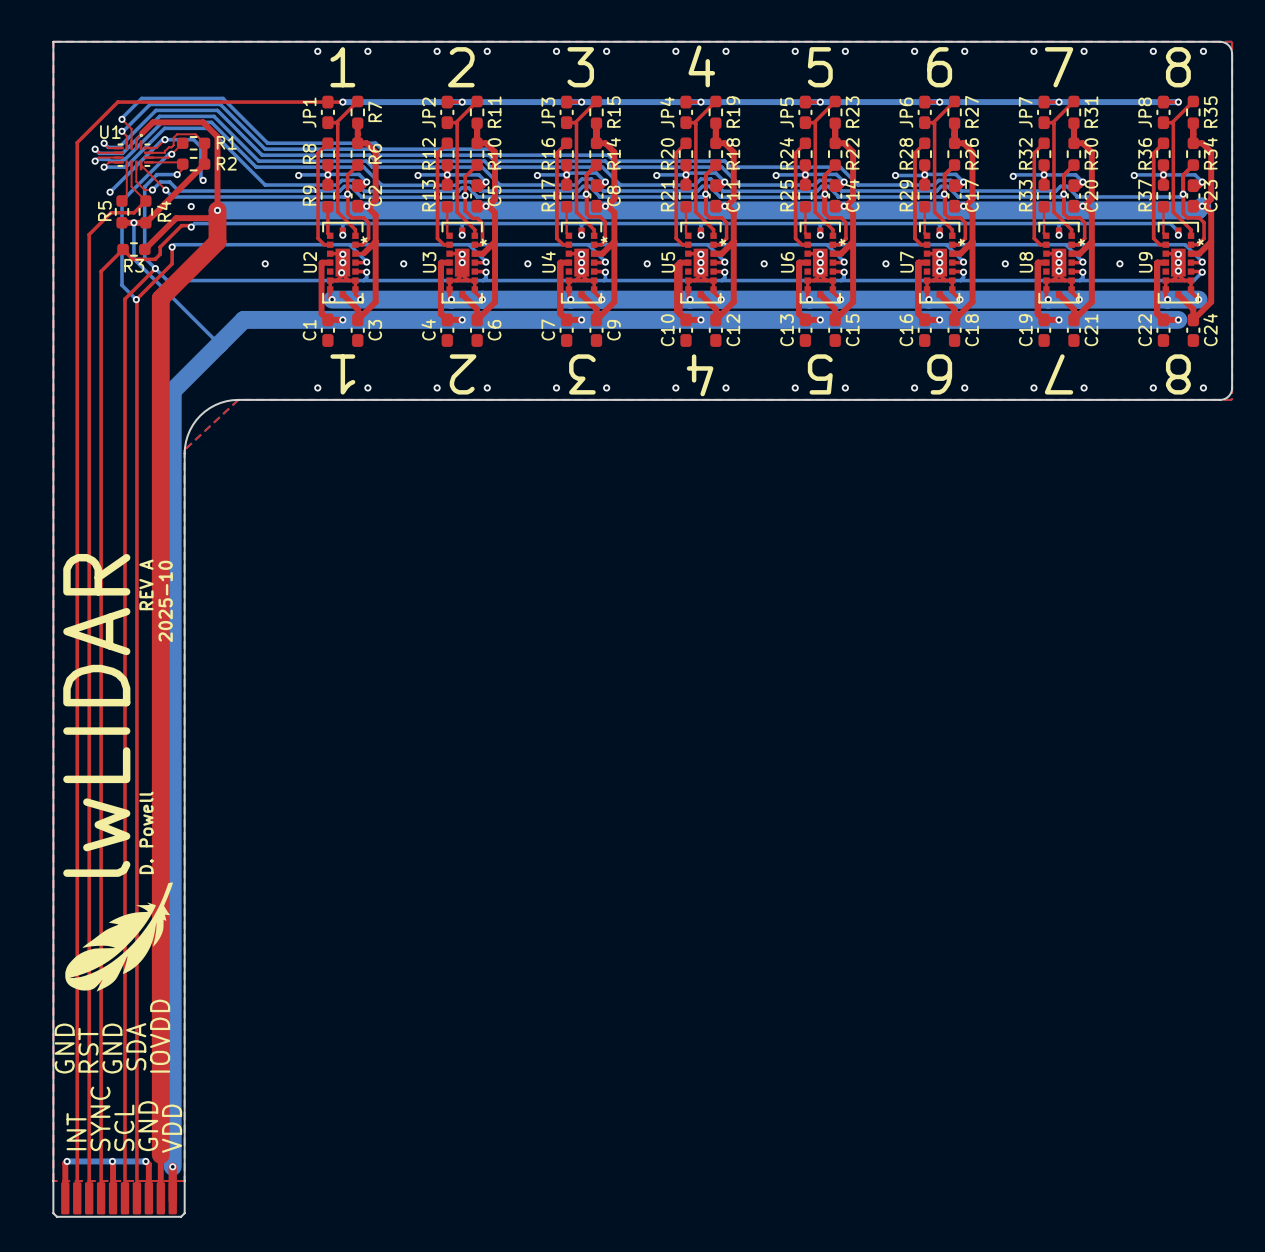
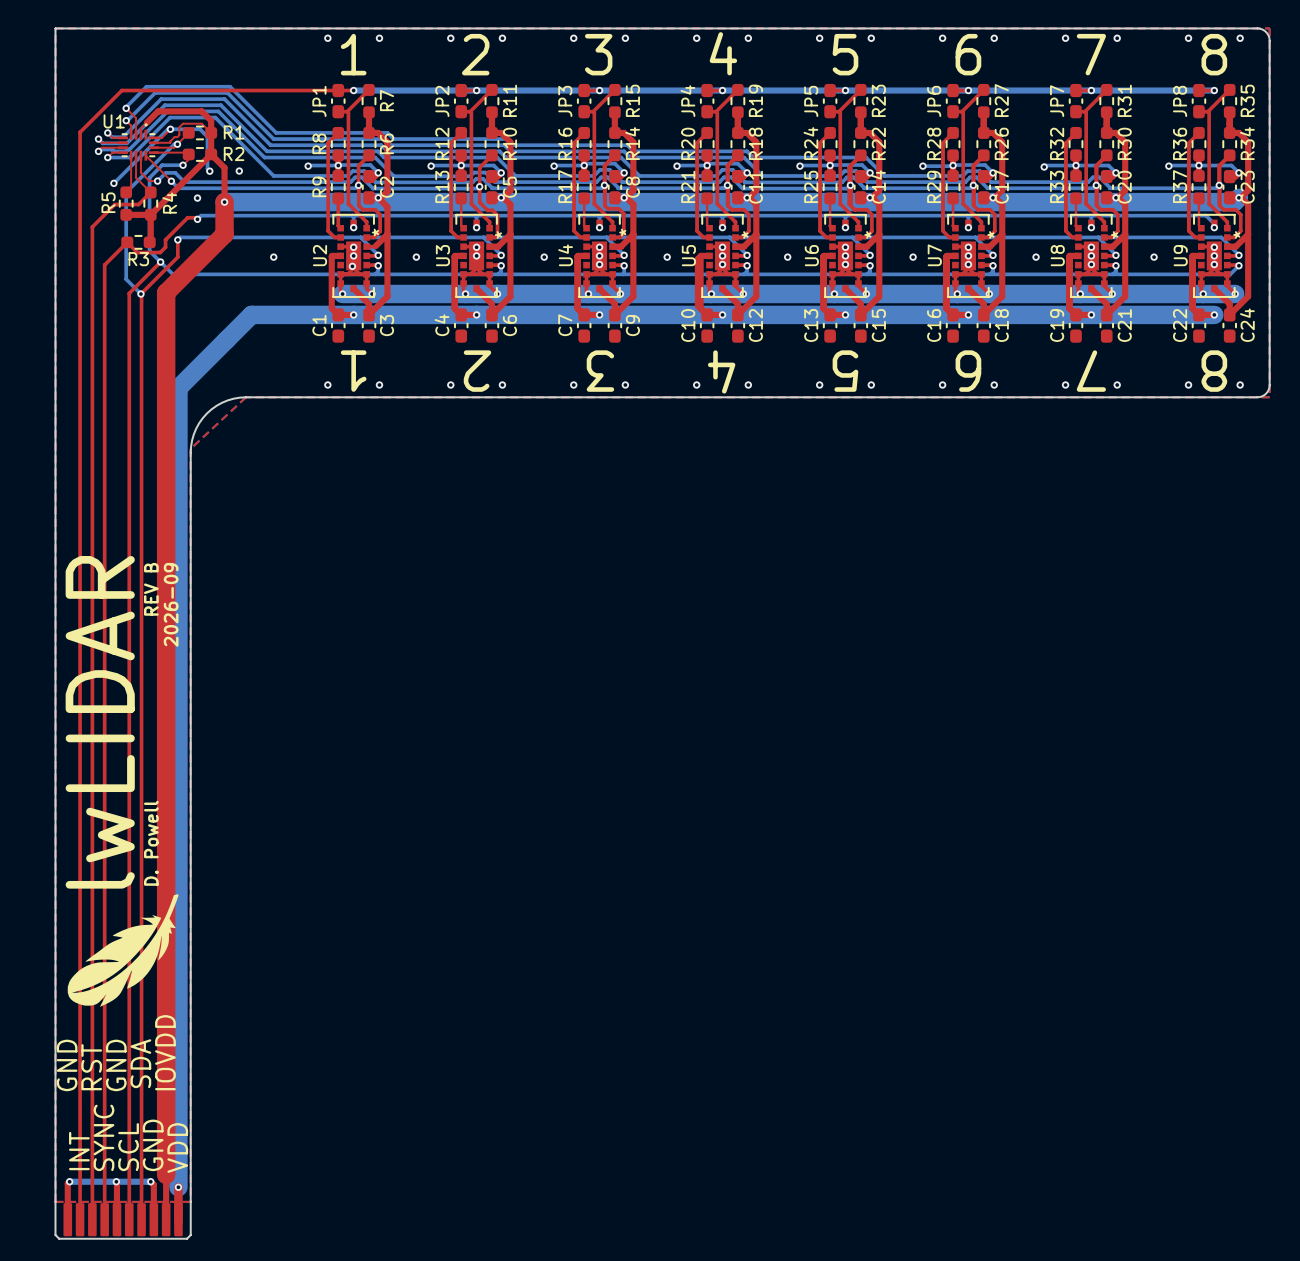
top track: (195, 122) (203, 122) (217, 136) (217, 177) -> (201, 111) (211, 120) (211, 132)
top track: none -> (211, 154) (224, 167)
via: none -> (239, 171)
top track: (217, 210) (209, 218) (176, 218) (145, 248) -> (150, 214) (150, 241)
bottom track: (133, 222) (133, 259) (219, 344) -> none
via: (133, 222) -> none
text: REV A (146, 584) -> REV B (151, 589)
text: 2025-10 (165, 601) -> 2026-09 (171, 604)

